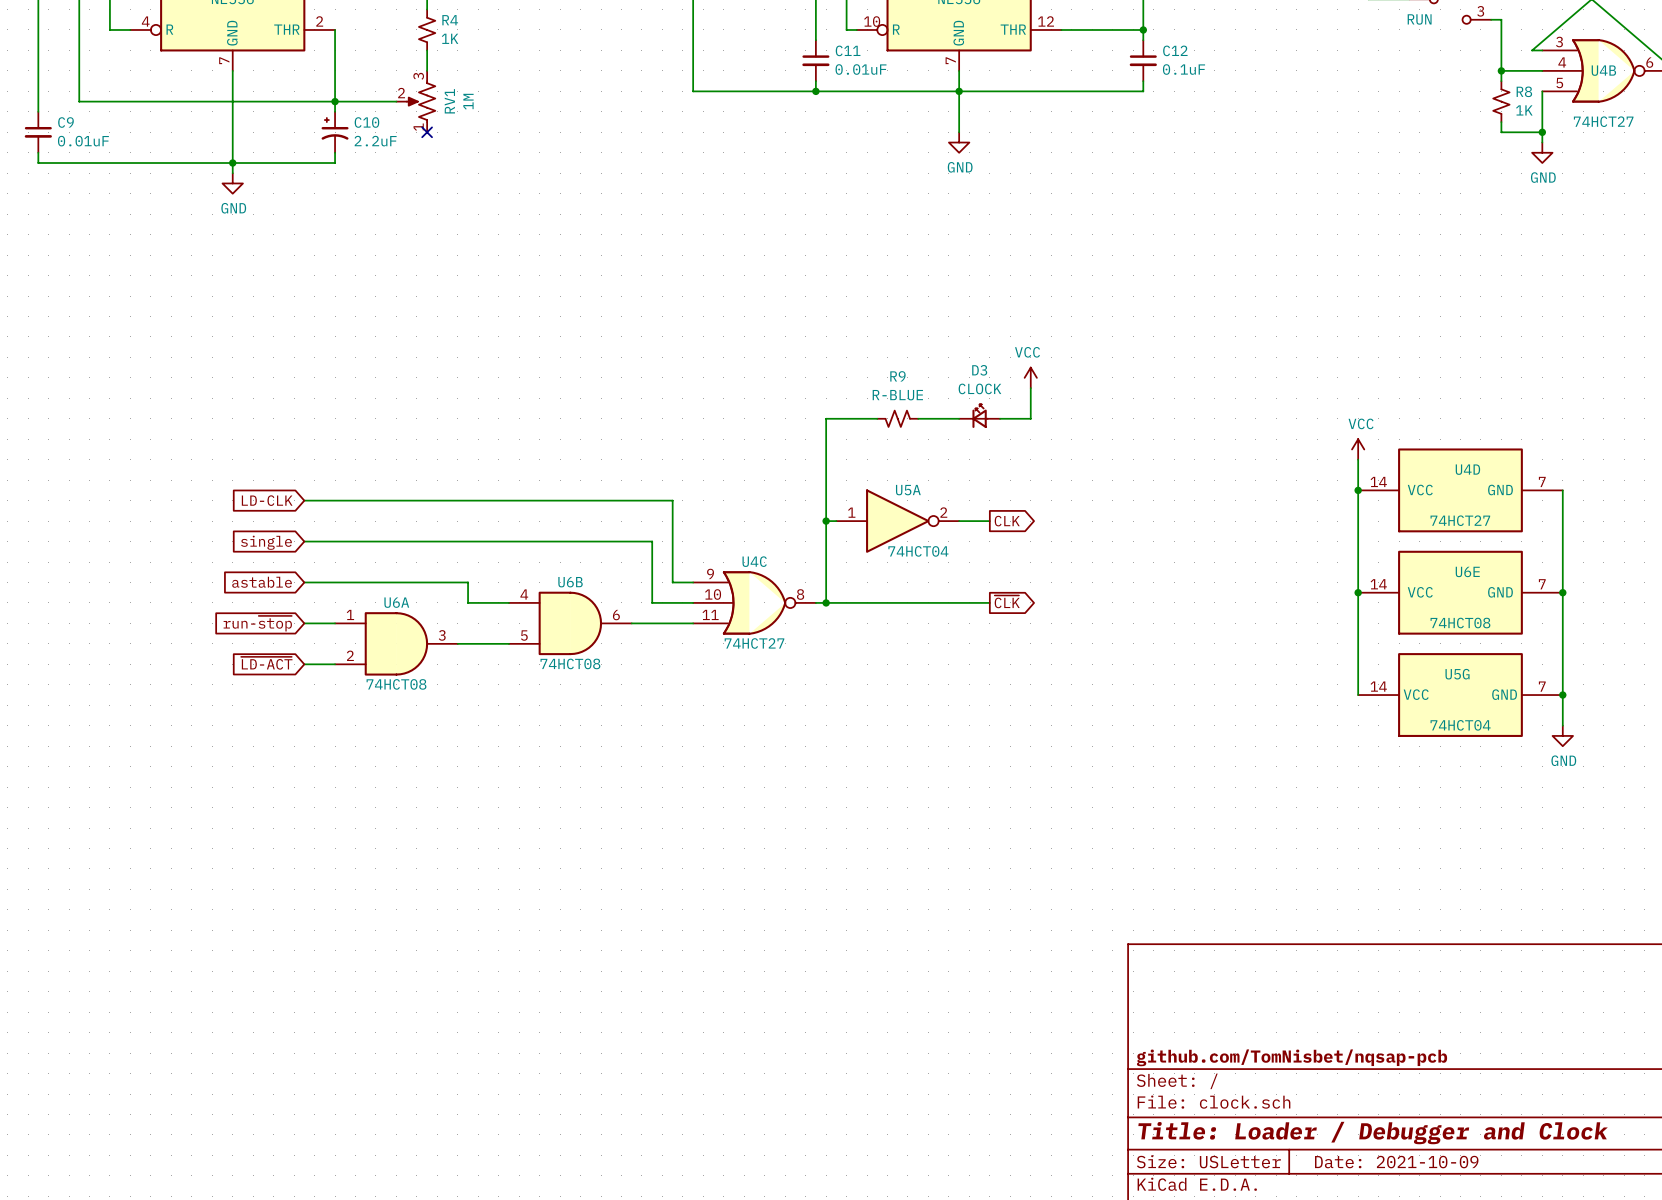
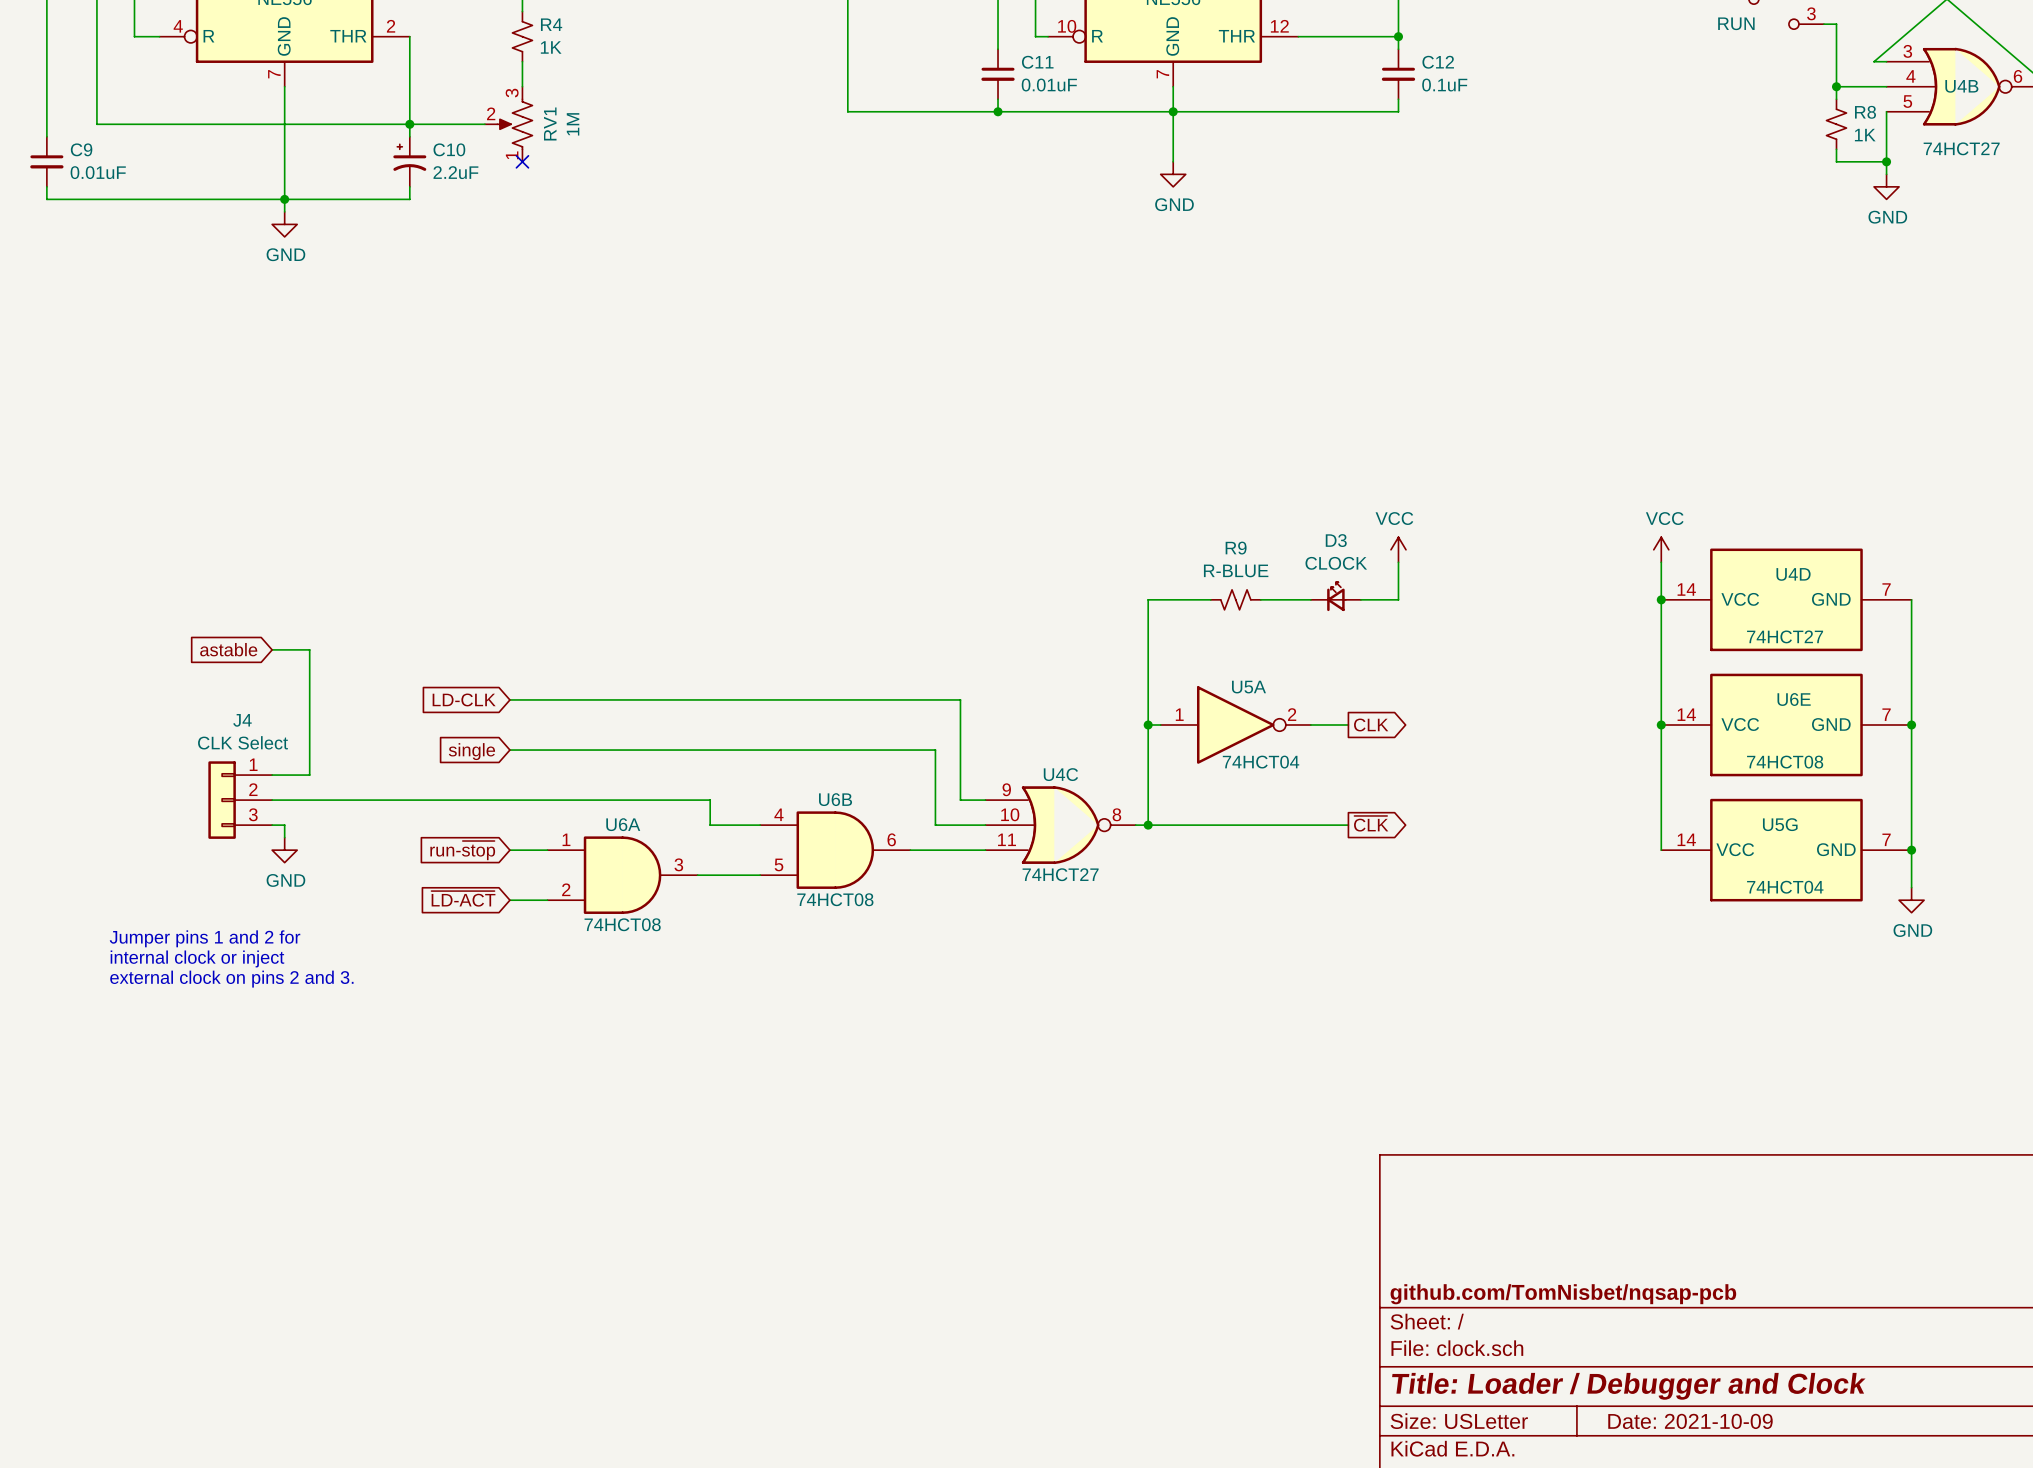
power symbol position: VCC (1030, 377) -> VCC (1398, 549)
wire: (1030, 388) (1030, 418) (1000, 418) -> (1398, 562) (1398, 599) (1360, 599)
D3 position: (979, 416) -> (1335, 596)
wire: (877, 418) (826, 418) (826, 602) -> (1210, 599) (1148, 599) (1148, 825)
R9 position: (897, 418) -> (1235, 599)
wire: (918, 418) (959, 418) -> (1260, 599) (1310, 599)
global label position: LD-CLK (267, 500) -> LD-CLK (464, 699)
wire: (304, 500) (672, 500) (672, 582) (693, 582) -> (509, 699) (960, 699) (960, 800) (985, 800)
wire: (826, 521) (836, 521) -> (1148, 725) (1160, 725)
junction: (826, 521) -> none
U5A position: (897, 521) -> (1235, 725)
wire: (959, 521) (989, 521) -> (1310, 725) (1348, 725)
global label position: CLK (1007, 521) -> CLK (1371, 724)
wire: none -> (272, 649) (309, 649) (309, 775) (272, 775)
wire: (304, 541) (652, 541) (652, 602) (693, 602) -> (509, 750) (935, 750) (935, 825) (985, 825)
global label position: single (266, 542) -> single (471, 751)
global label position: astable (262, 582) -> astable (228, 649)
wire: (304, 582) (468, 582) (468, 602) (508, 602) -> none
junction: none -> (1148, 725)
global label position: ~{CLK} (1007, 601) -> ~{CLK} (1371, 823)
U4C position: (754, 602) -> (1060, 825)
wire: (815, 602) (989, 602) -> (1135, 825) (1348, 825)
junction: (826, 602) -> none
global label position: run-~{stop} (257, 623) -> run-~{stop} (462, 850)
wire: (304, 623) (335, 623) -> (509, 850) (547, 850)
U6B position: (570, 623) -> (835, 850)
wire: (631, 623) (693, 623) -> (910, 850) (985, 850)
U6A position: (396, 643) -> (622, 875)
wire: (457, 643) (508, 643) -> (697, 875) (760, 875)
J4: none -> CLK Select (240, 800)
wire: none -> (272, 800) (710, 800) (710, 825) (760, 825)
global label position: ~{LD-ACT} (266, 663) -> ~{LD-ACT} (463, 898)
wire: (304, 664) (335, 664) -> (509, 900) (547, 900)
wire: none -> (272, 825) (284, 825) (284, 837)
junction: none -> (1148, 825)
power symbol: none -> GND (284, 850)
text: none -> Jumper pins 1 and 2 for (205, 938)
text: none -> internal clock or inject (197, 958)
text: none -> external clock on pins 2 and 3. (231, 979)

